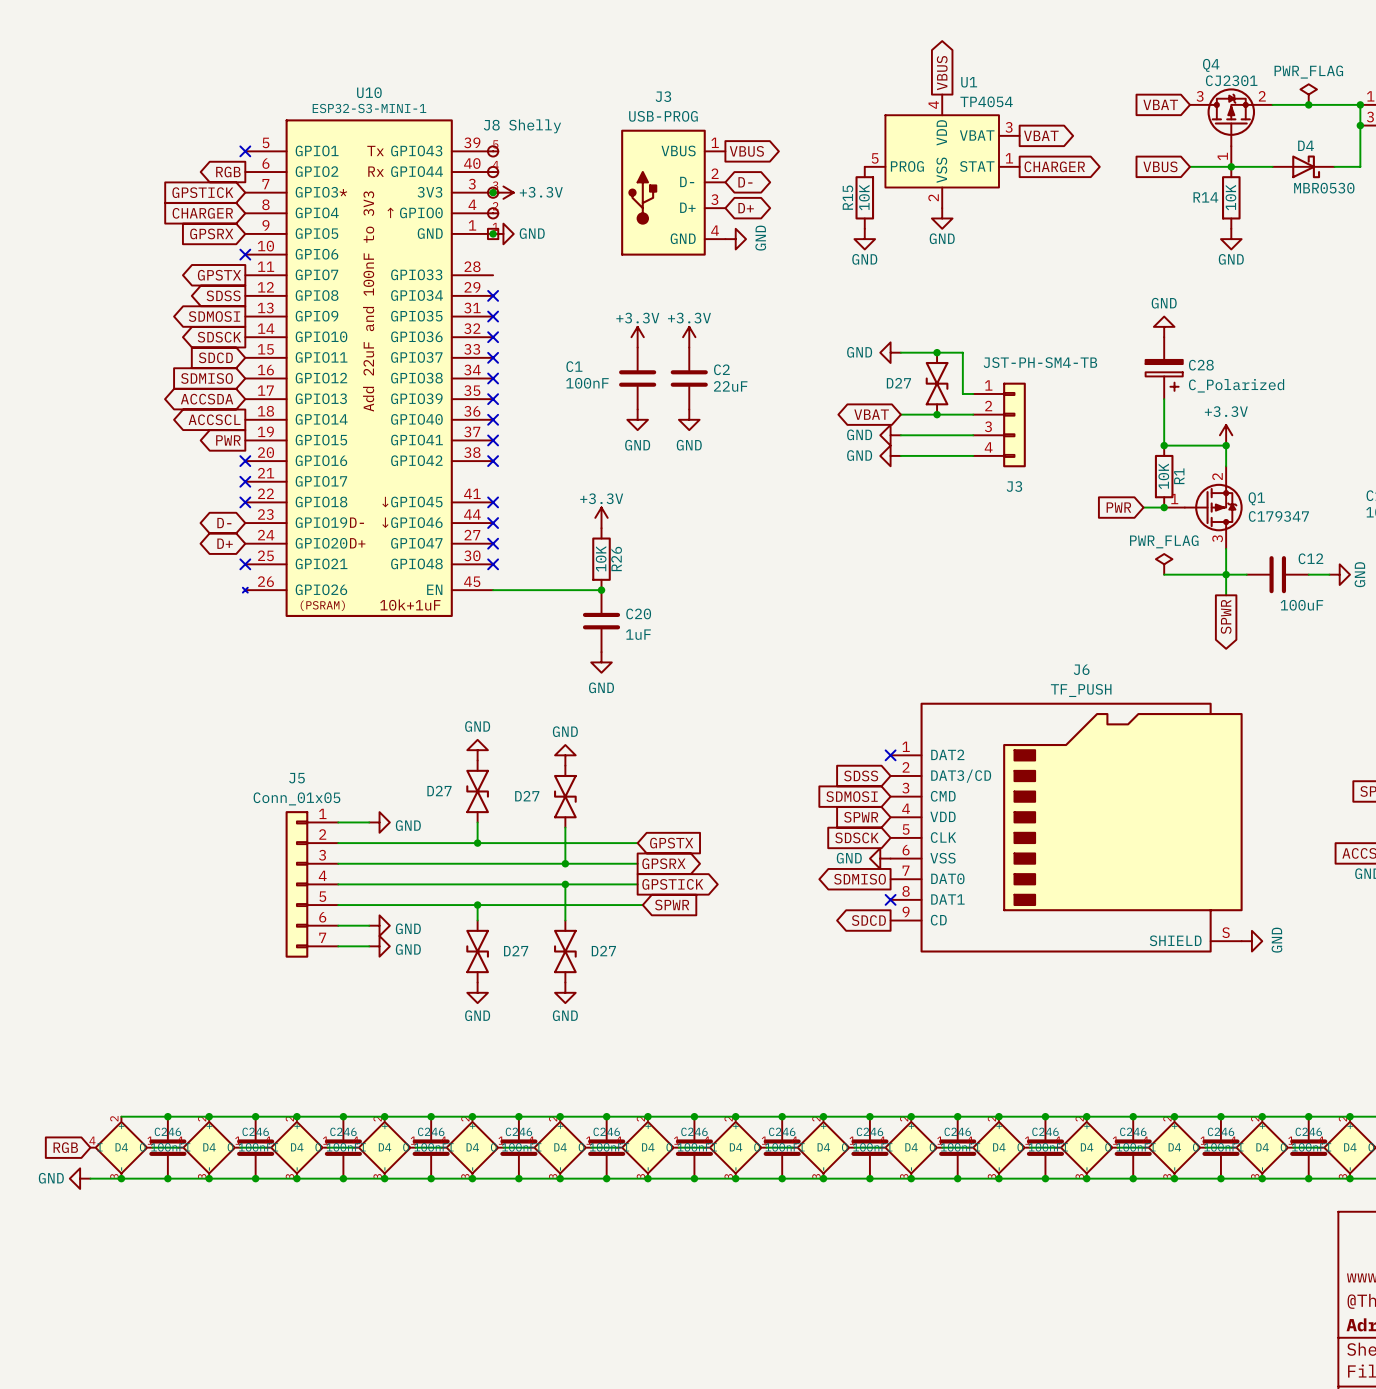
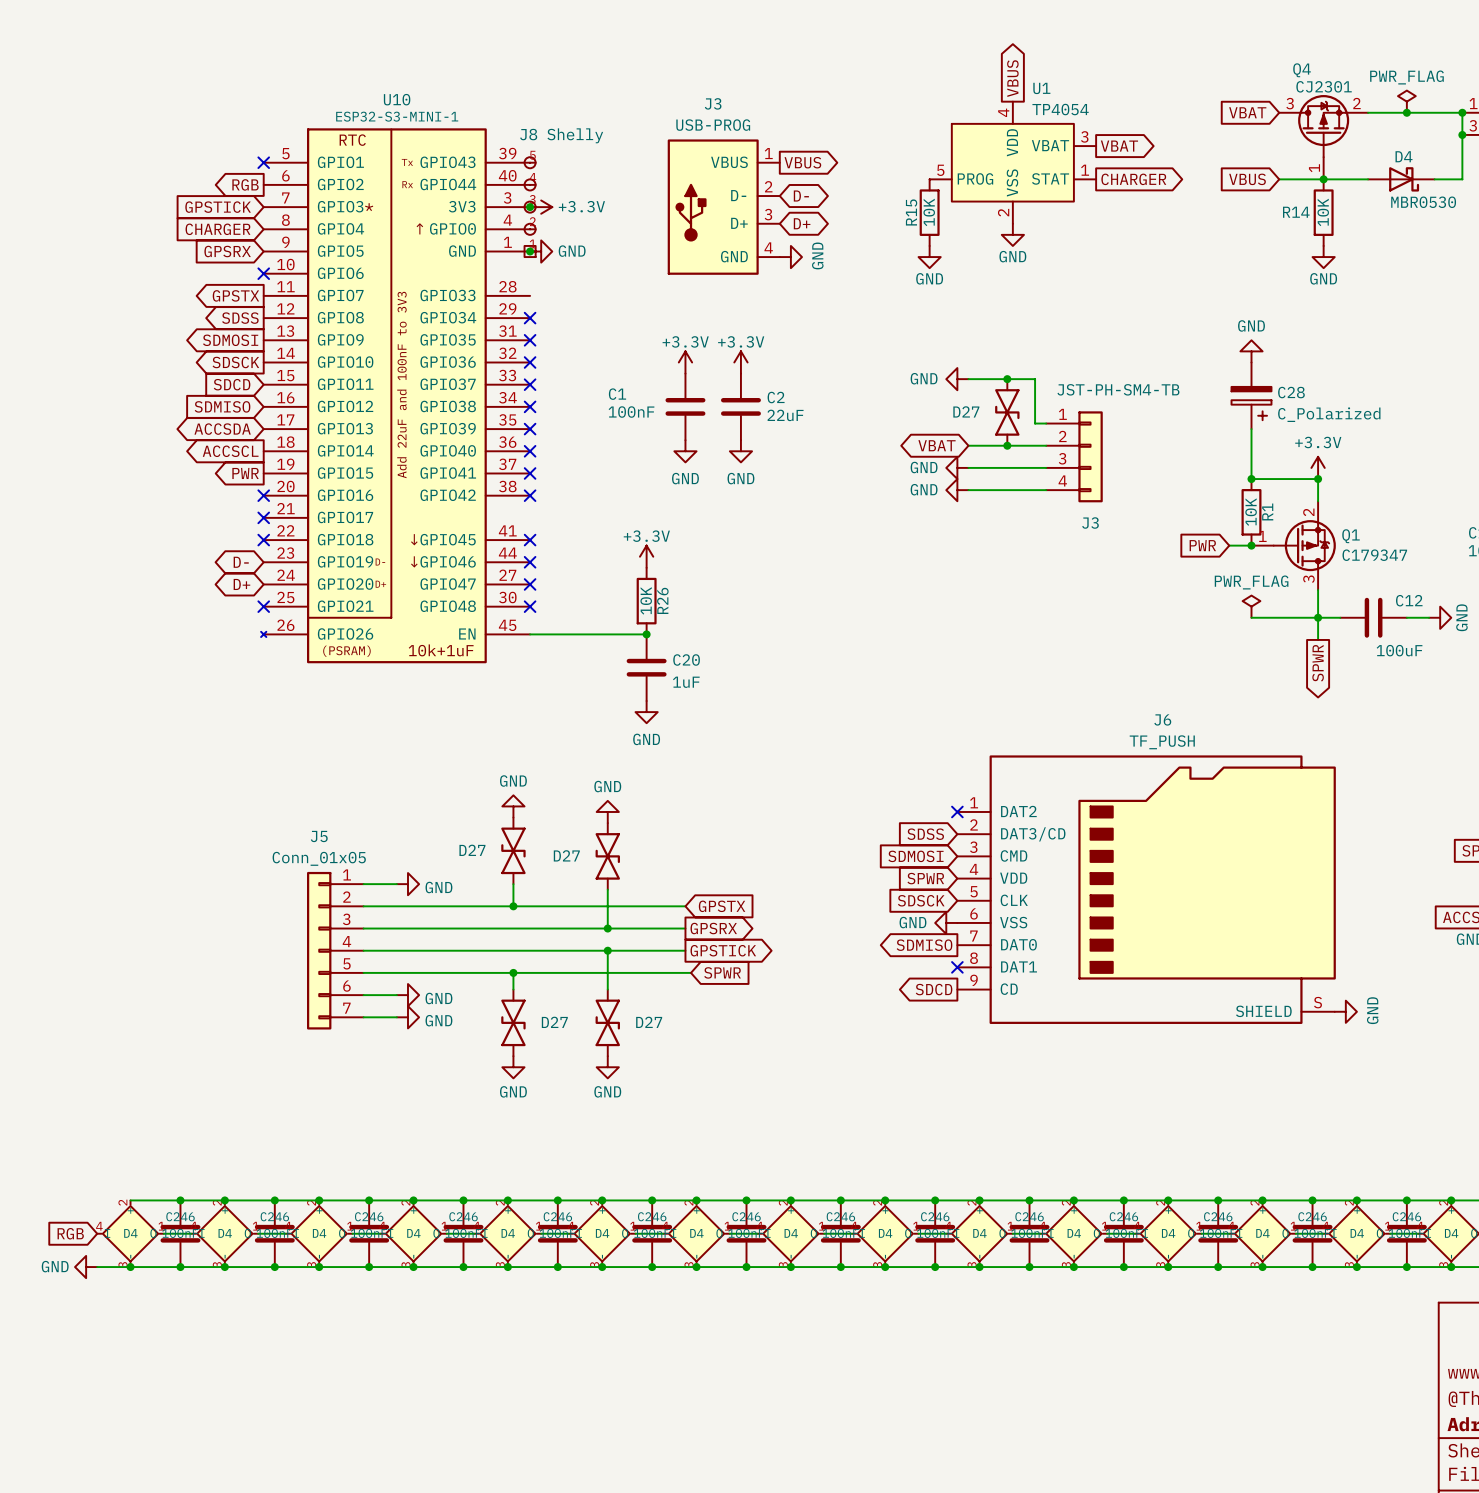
U10 symbol: [242, 119, 494, 617] -> [261, 128, 531, 664]

